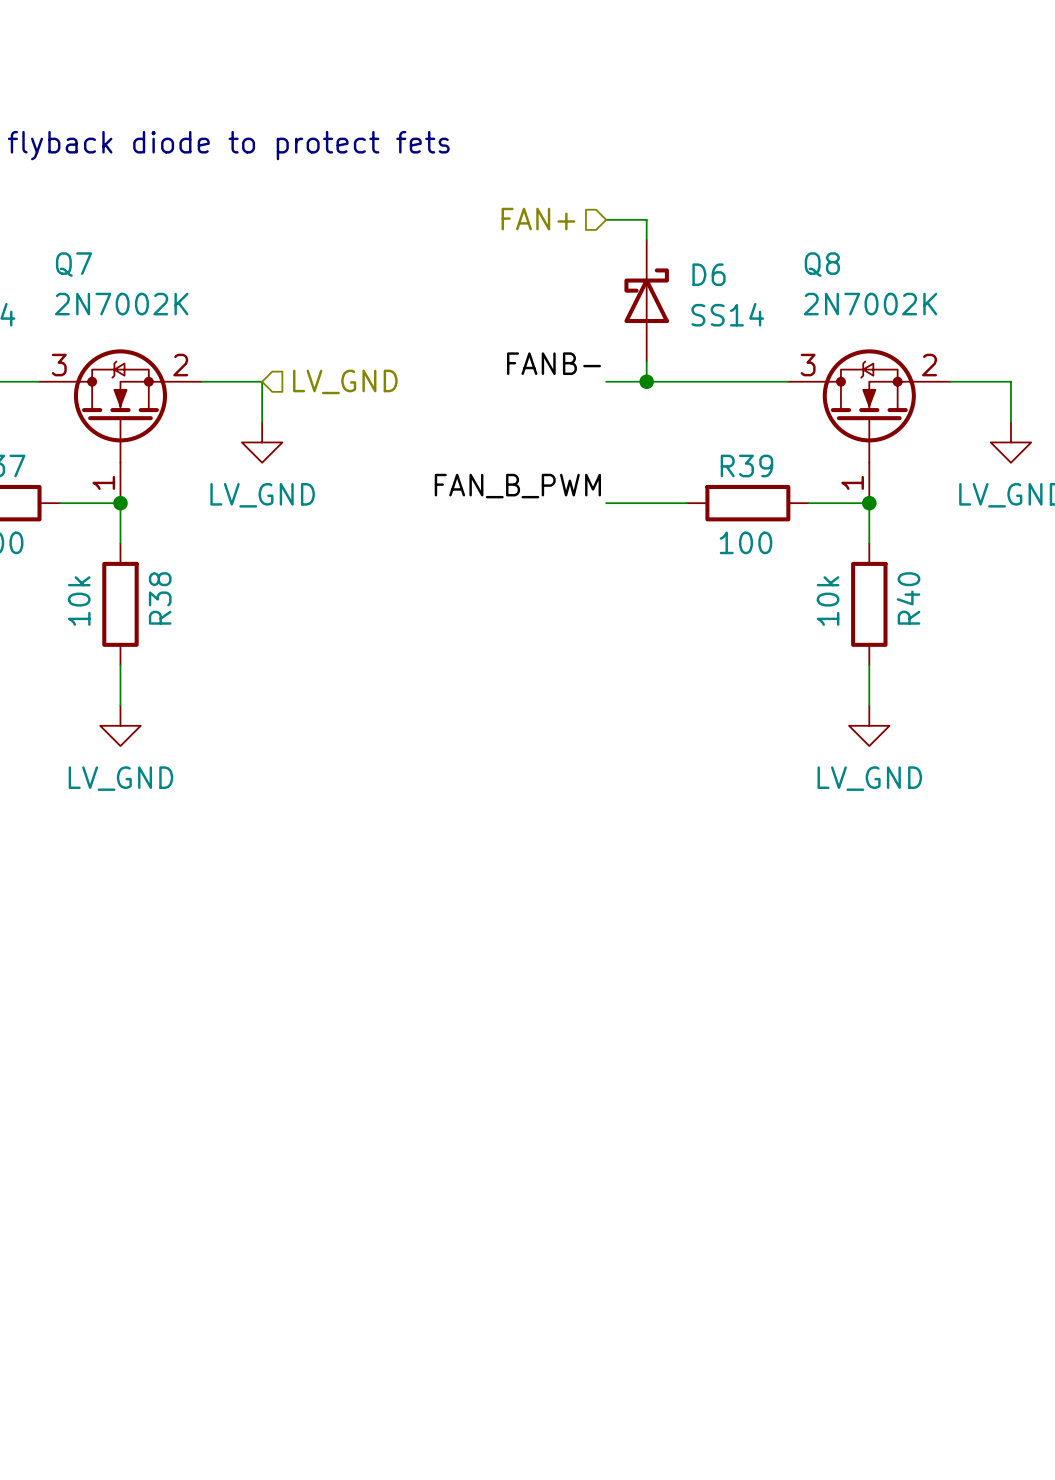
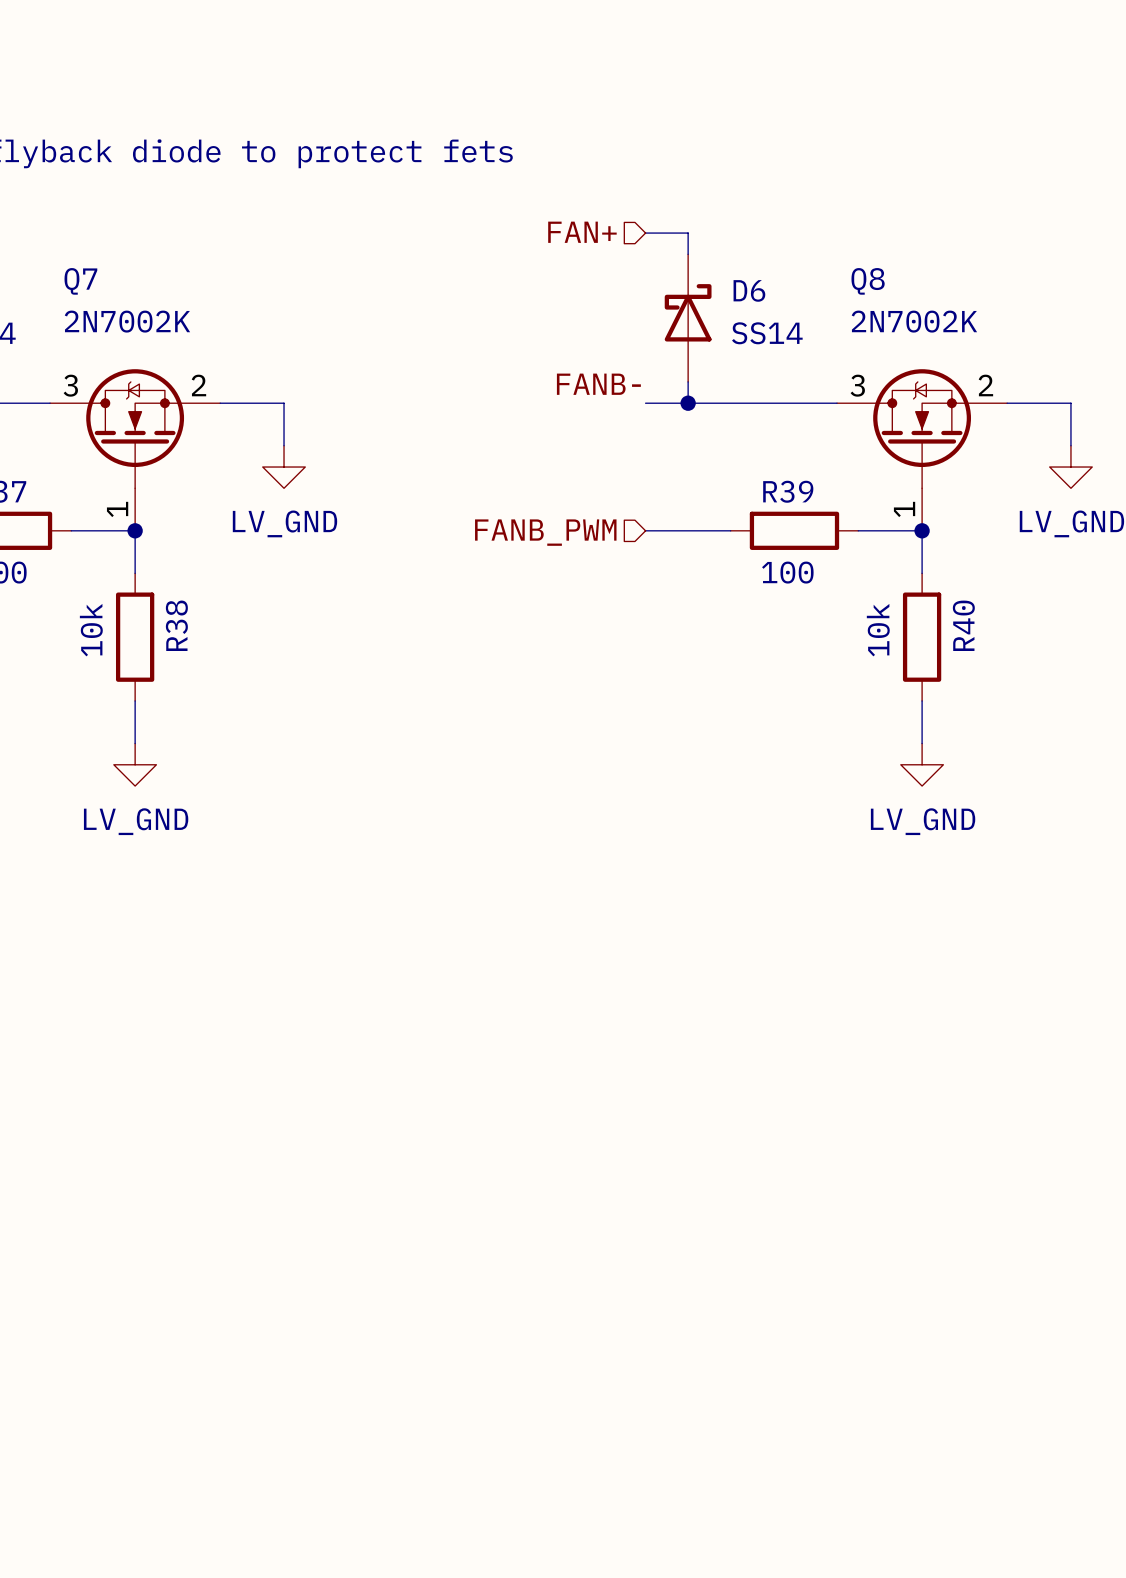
hierarchical label: LV_GND (345, 381) -> none
label: FAN_B_PWM (517, 486) -> none
hierarchical label: none -> FANB_PWM (545, 532)

